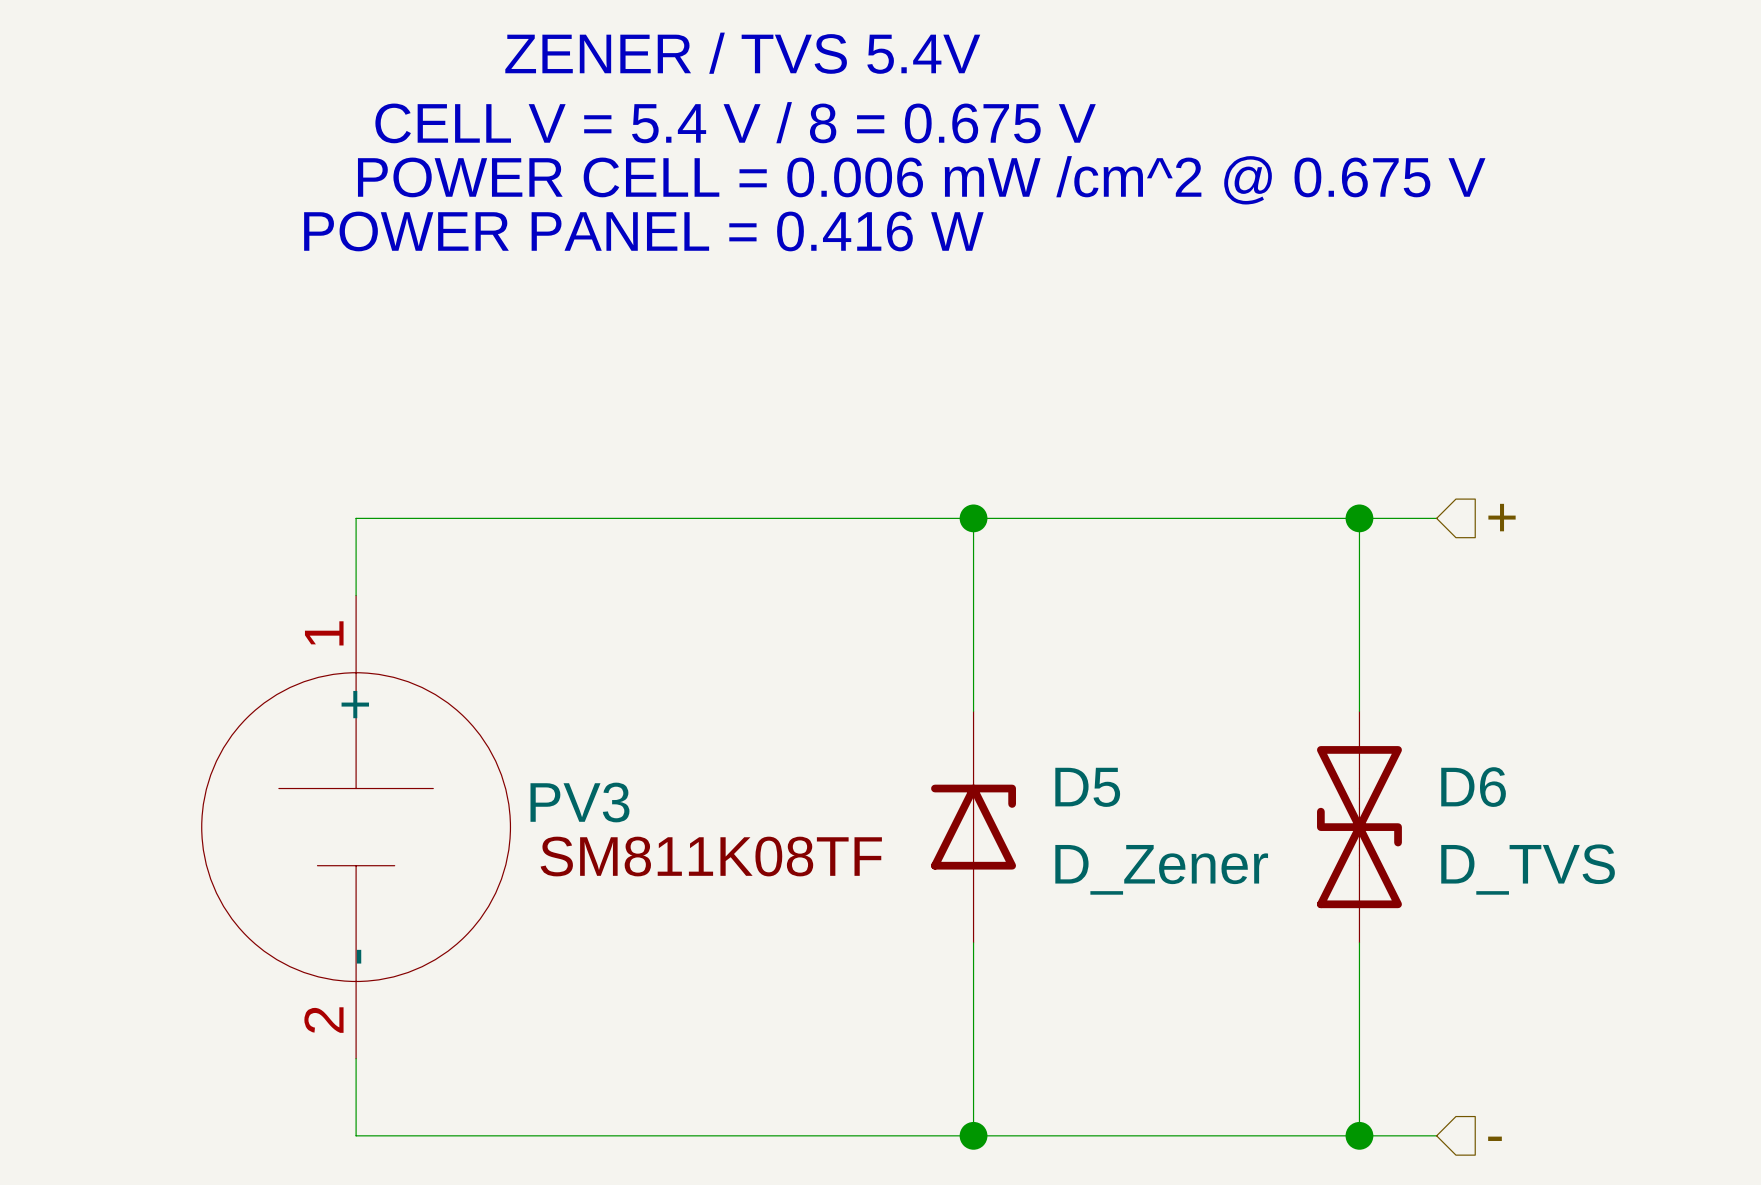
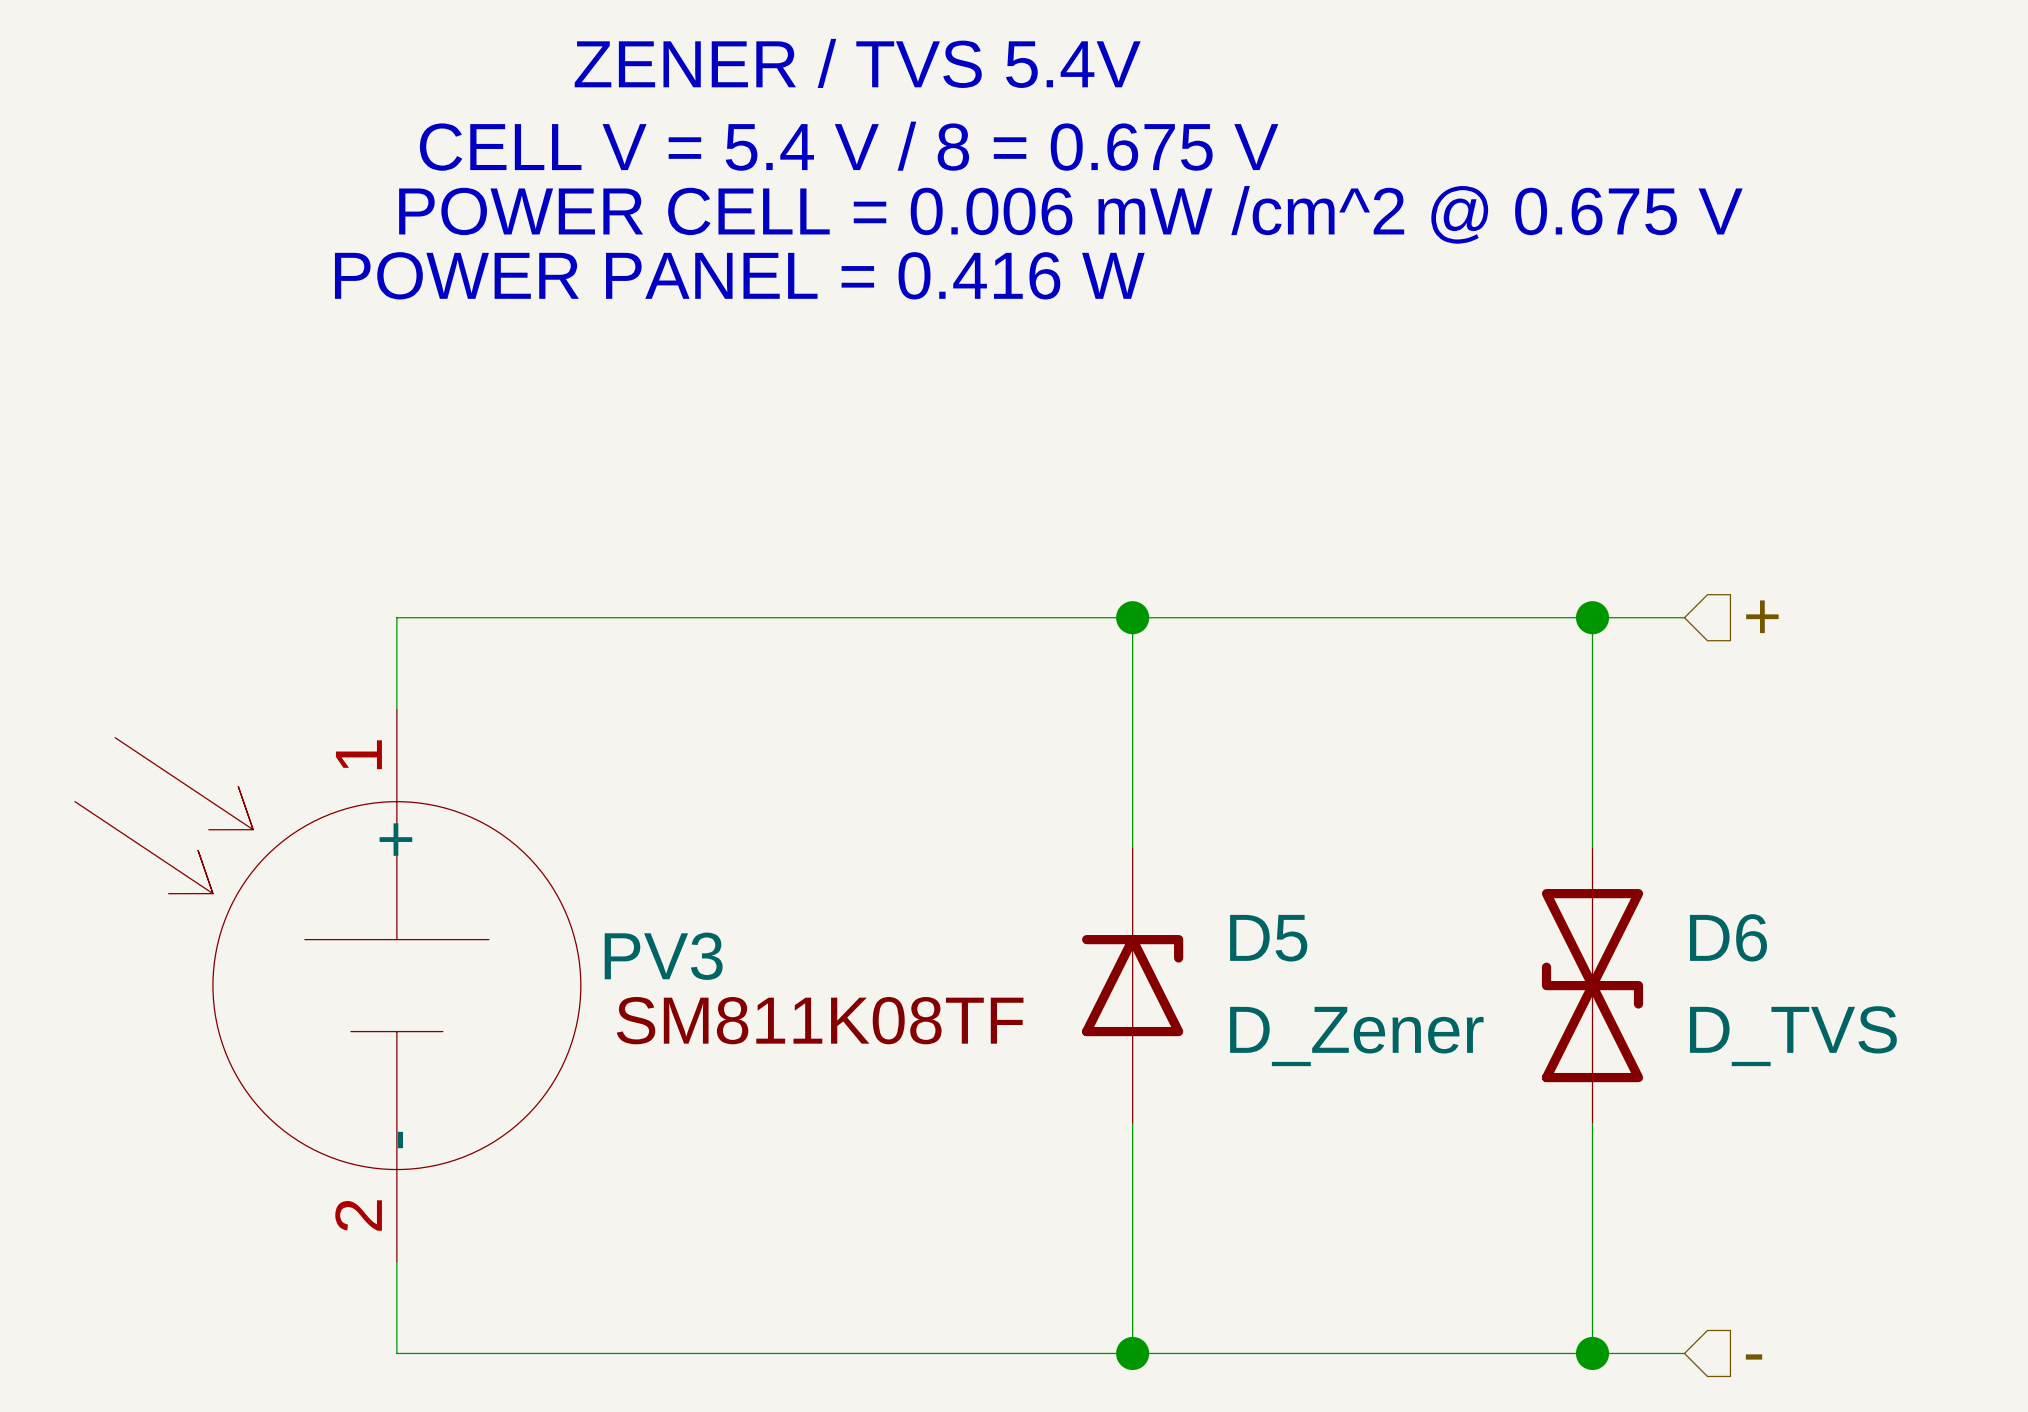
PV3 symbol: [201, 595, 511, 1059] -> [74, 709, 581, 1262]

